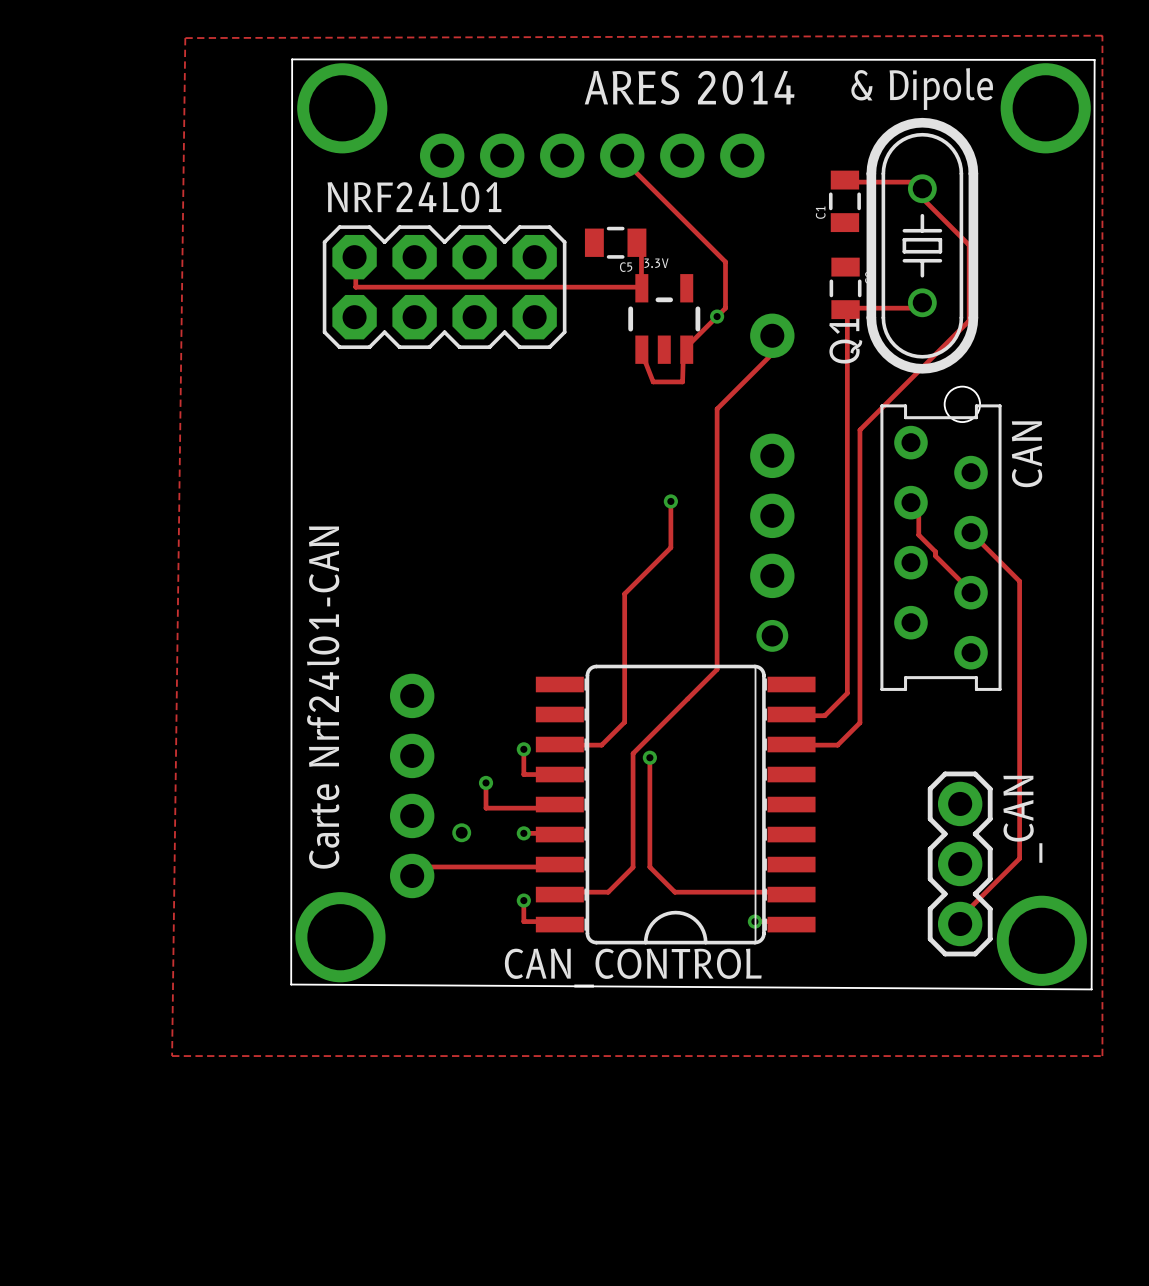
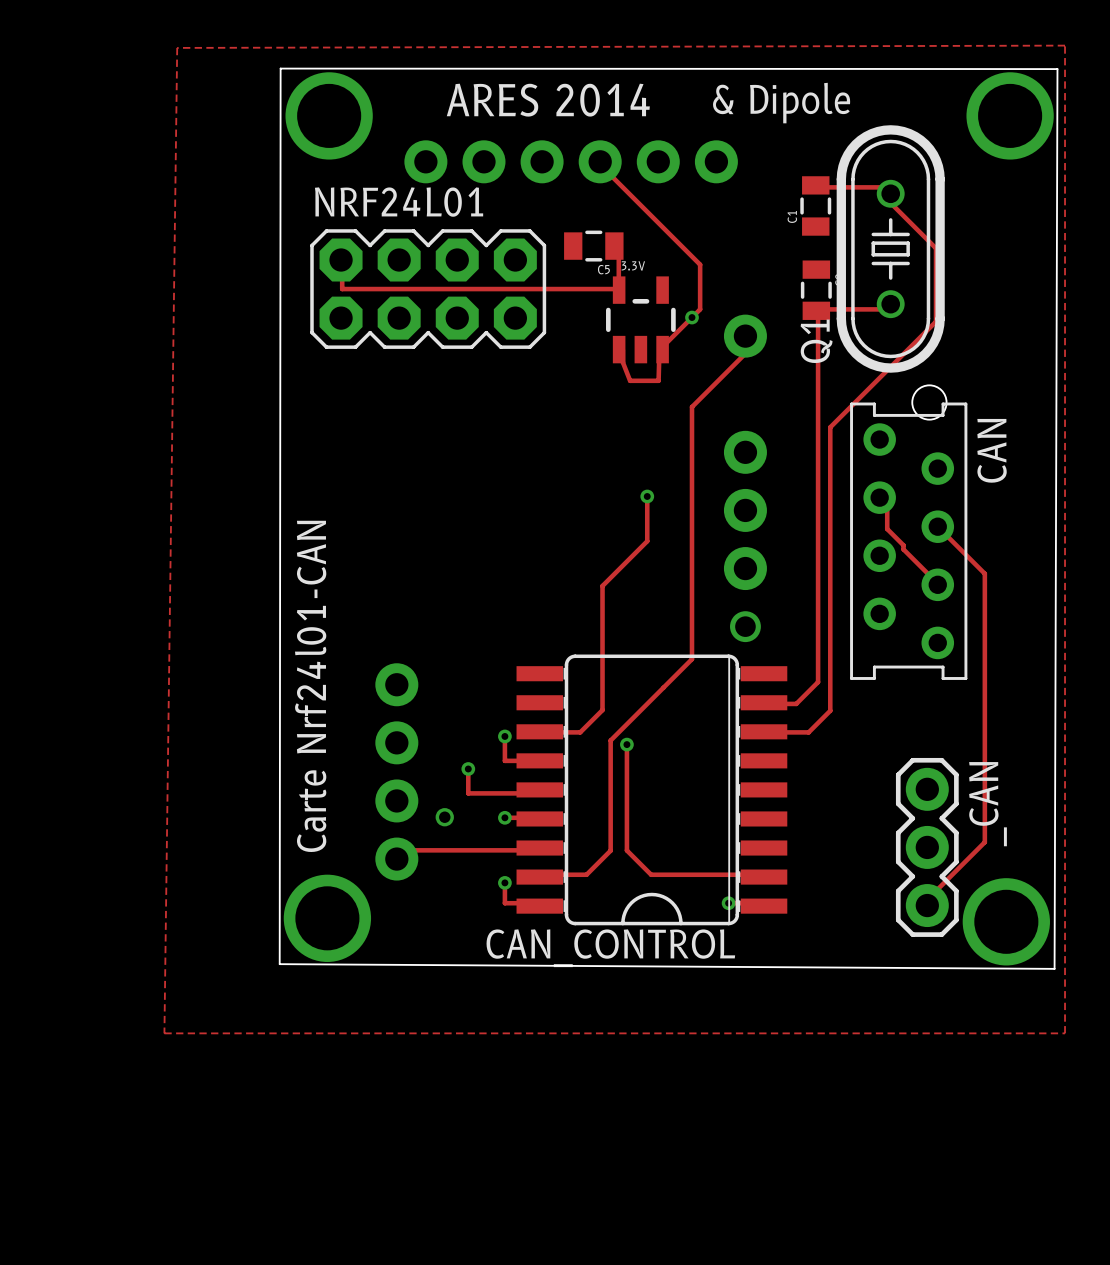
text position: ARES 2014 (689, 87) -> ARES 2014 (548, 100)
text position: & Dipole (922, 89) -> & Dipole (781, 103)

